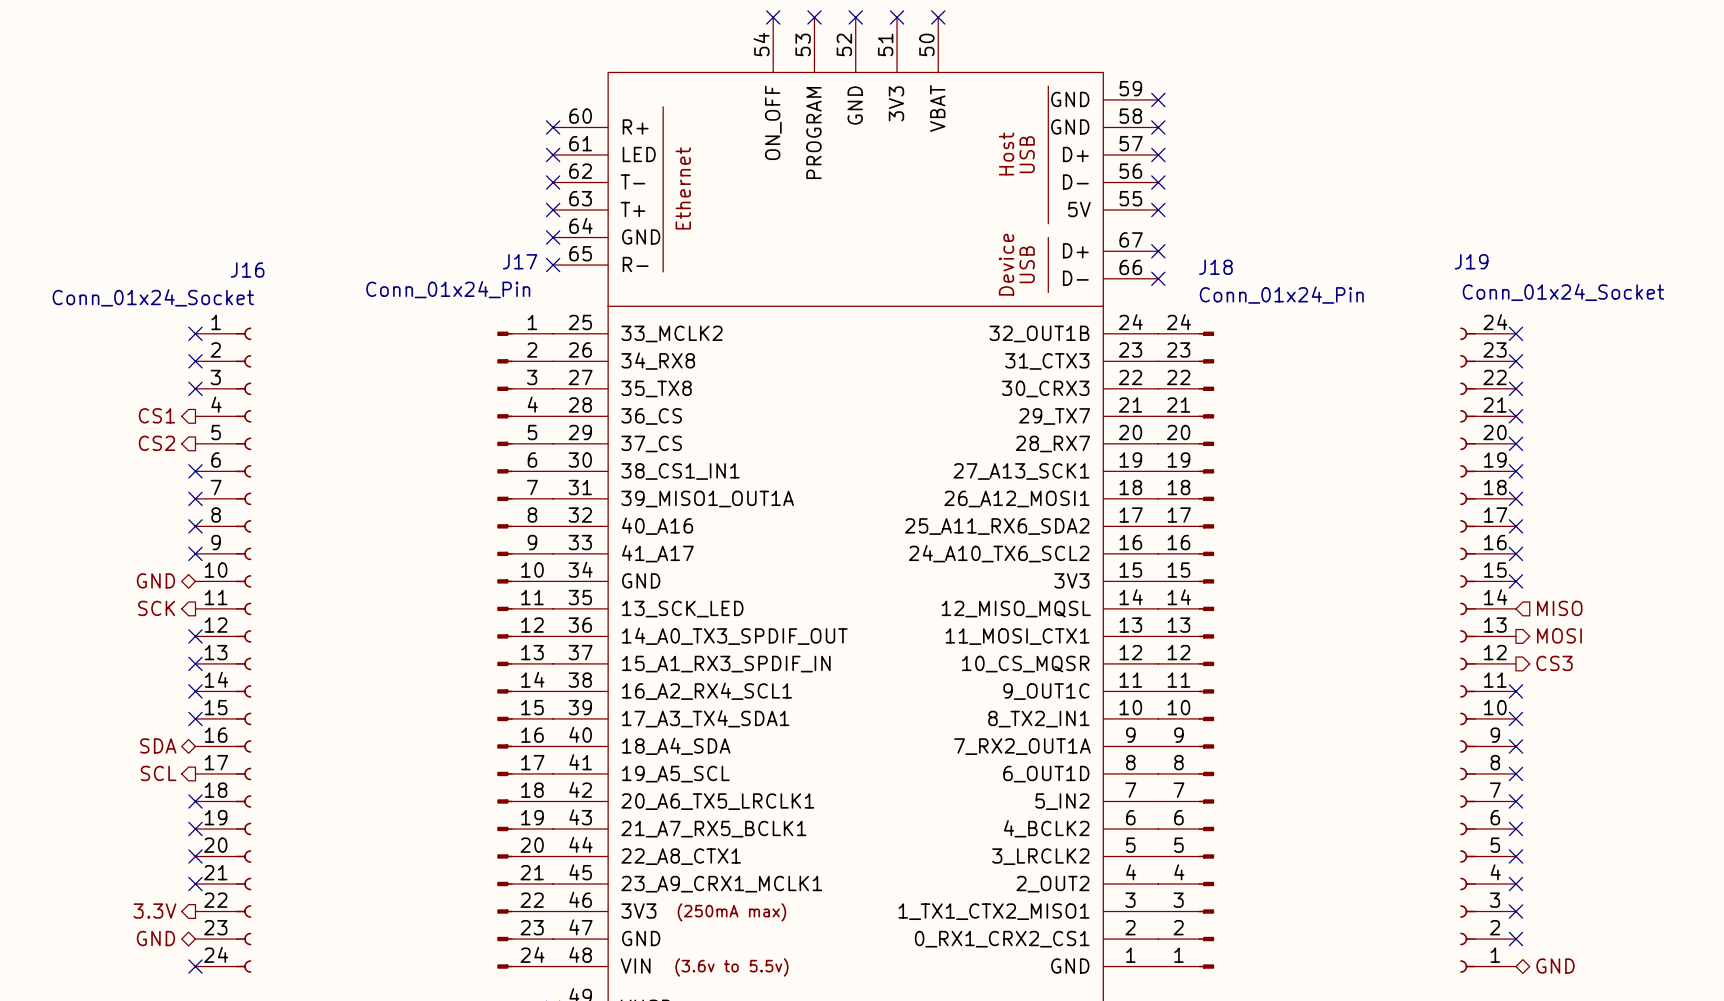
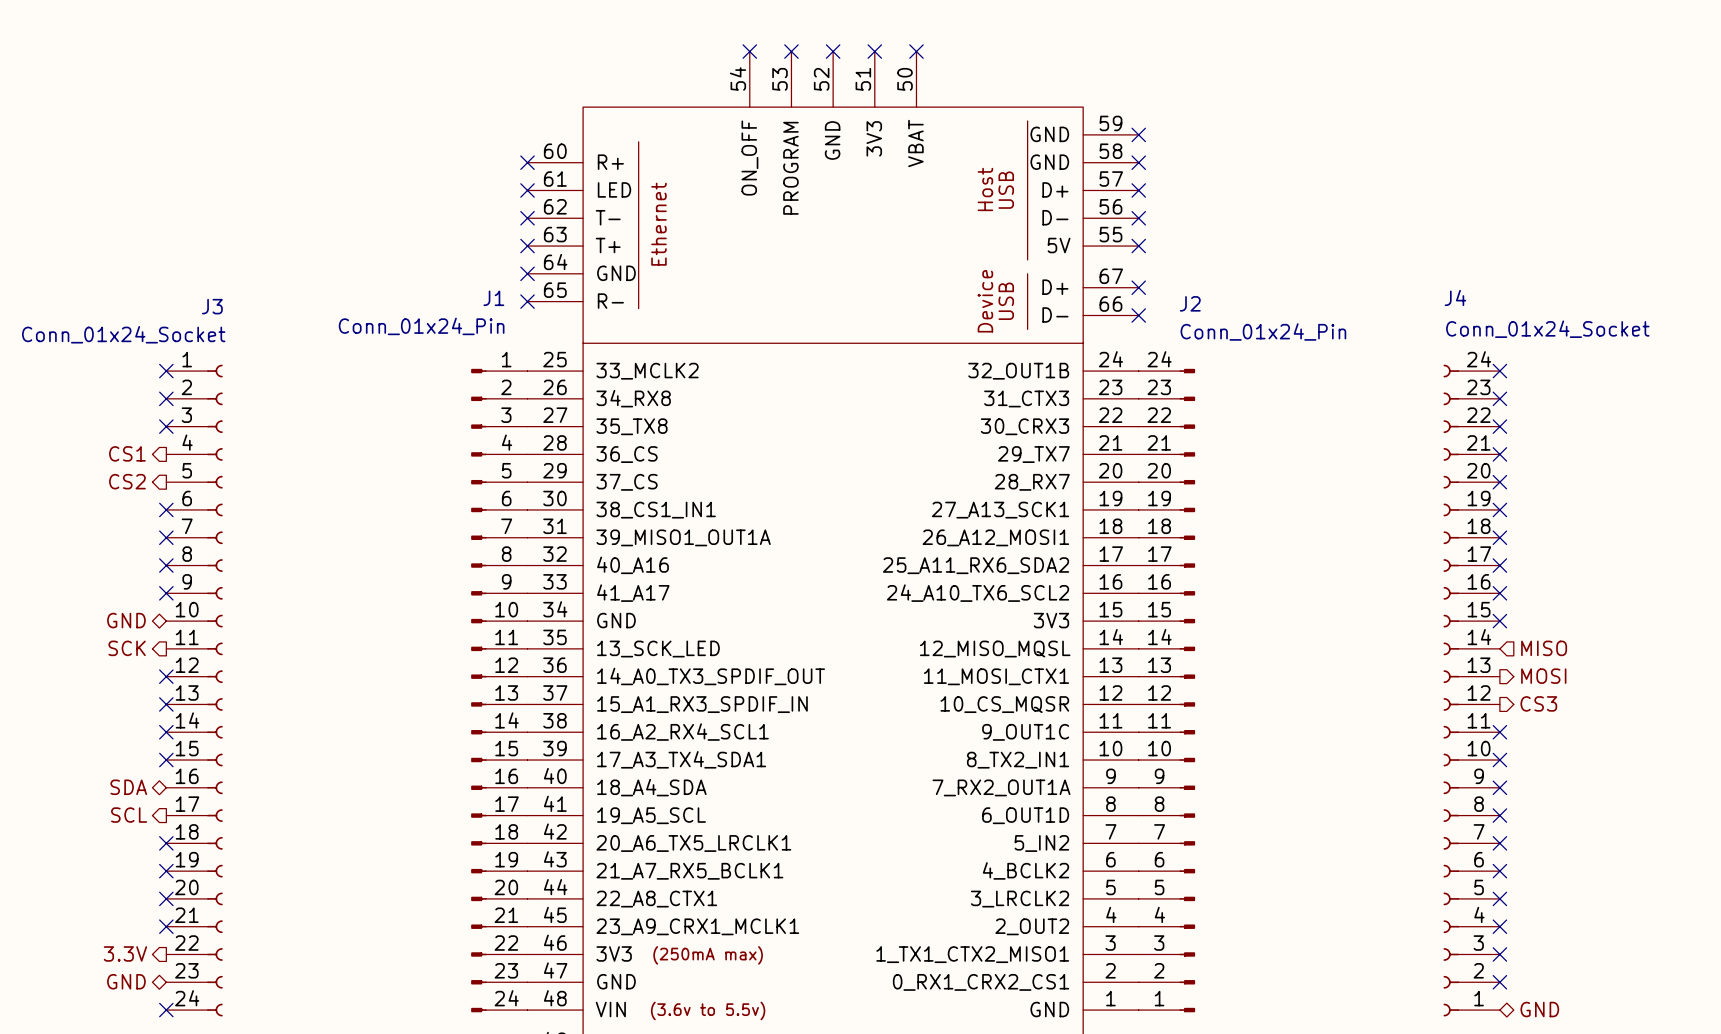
J17 name: J17 (520, 261) -> J1 (493, 298)
J19 name: J19 (1471, 261) -> J4 (1455, 297)
J18 name: J18 (1215, 267) -> J2 (1190, 303)
J16 name: J16 (247, 270) -> J3 (212, 306)

